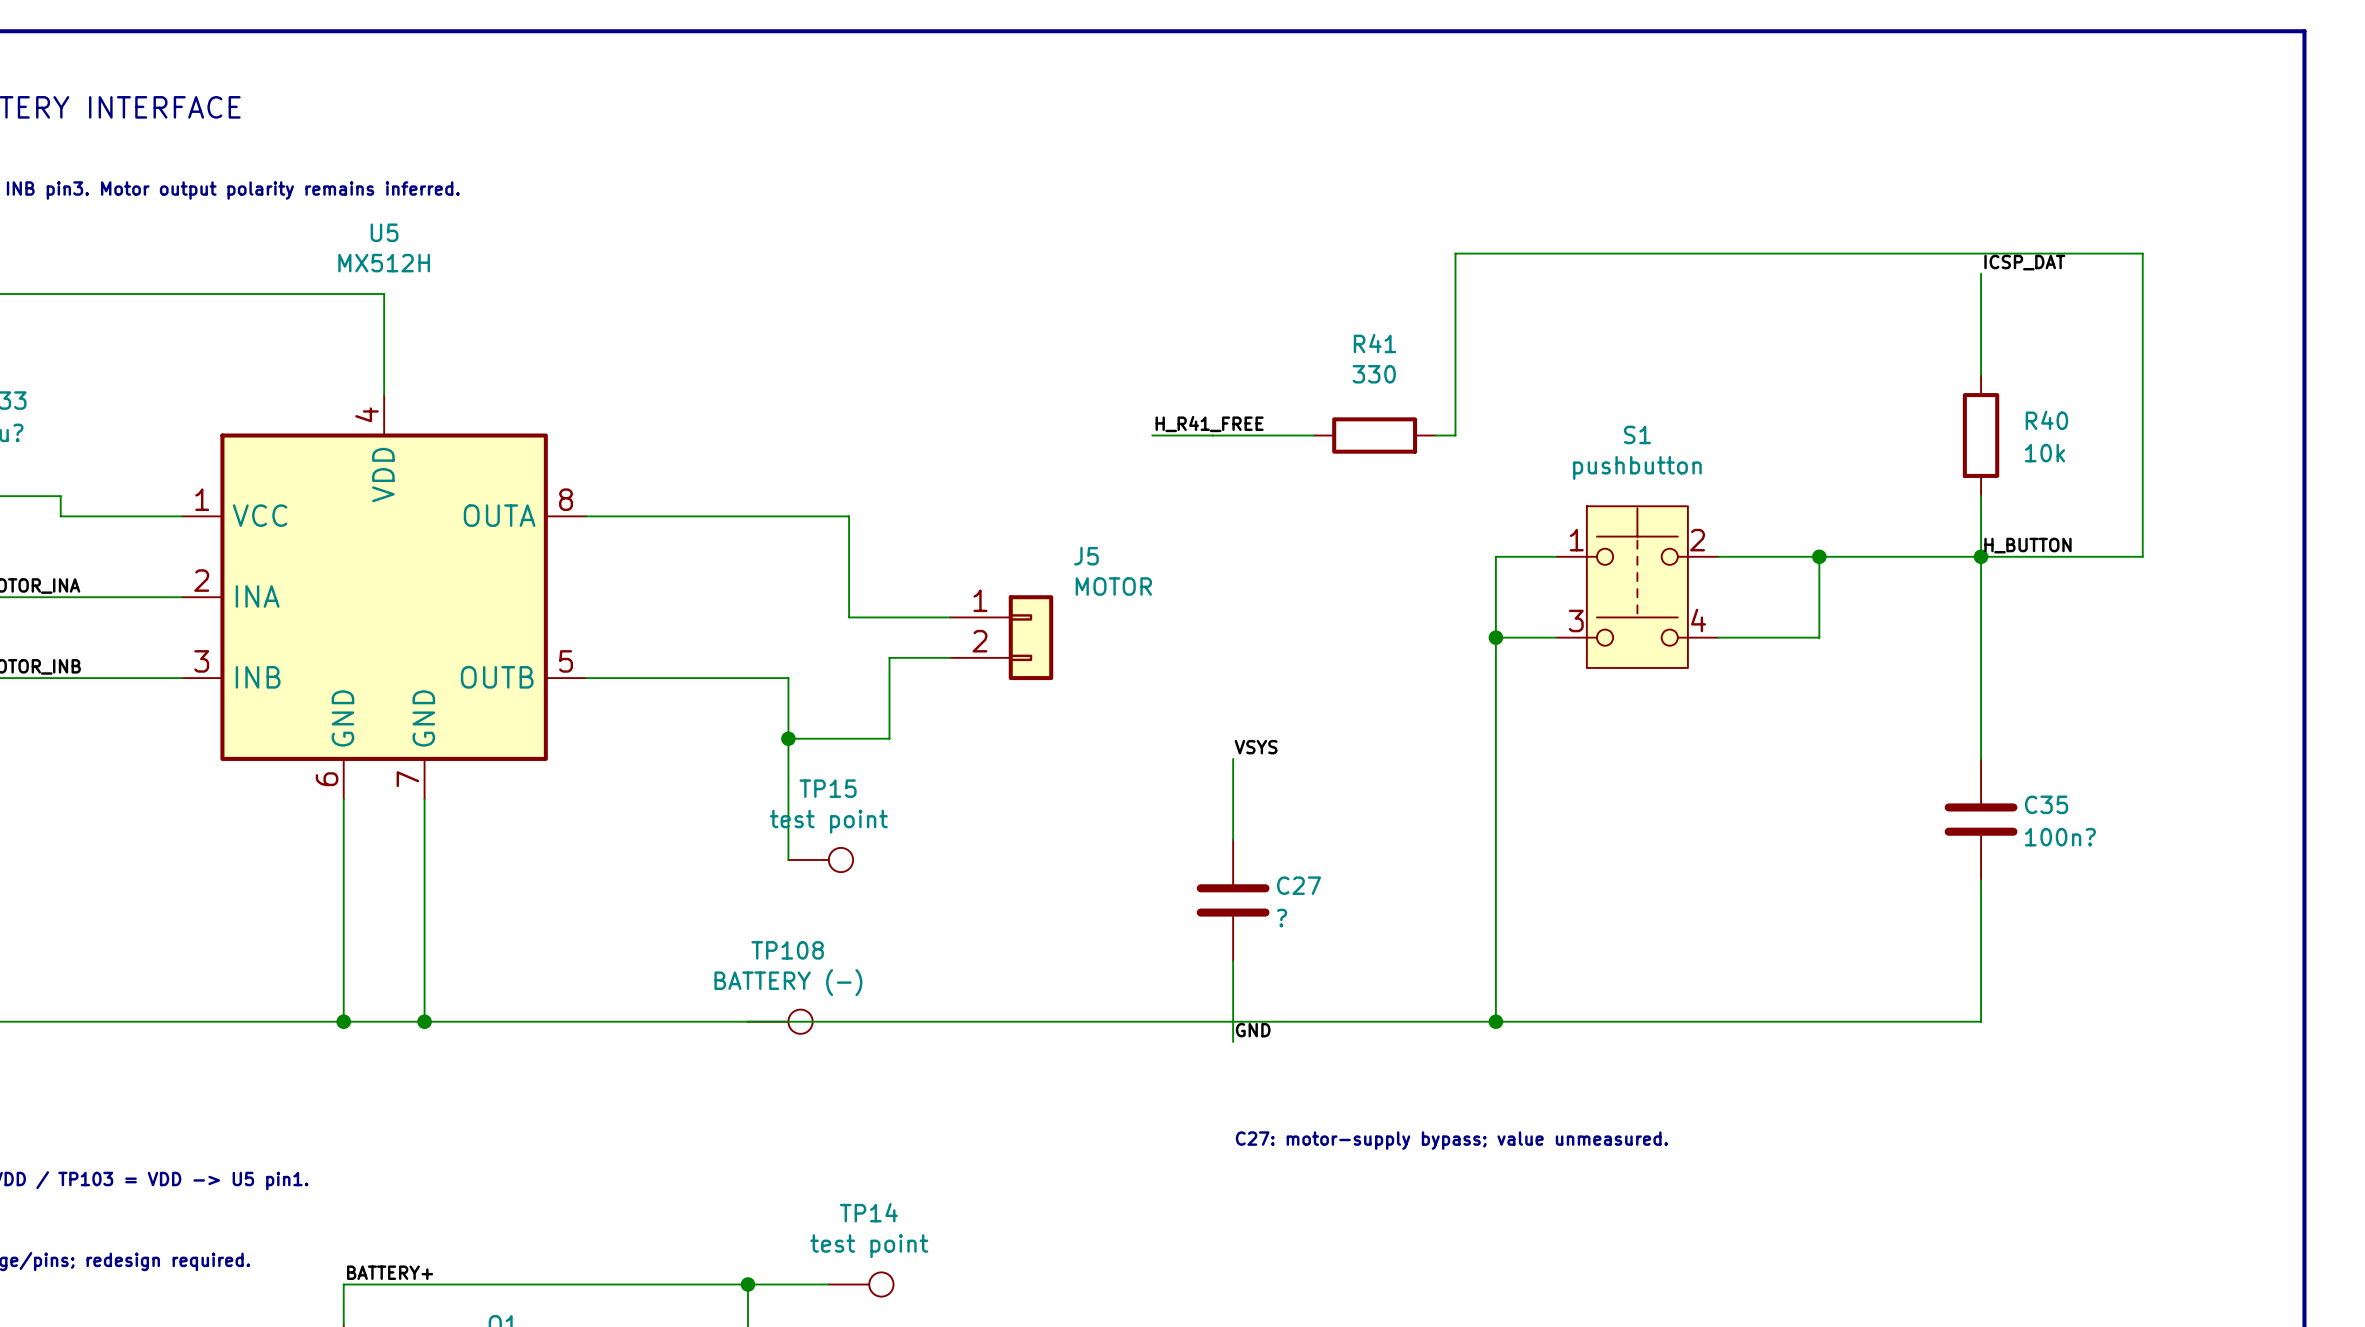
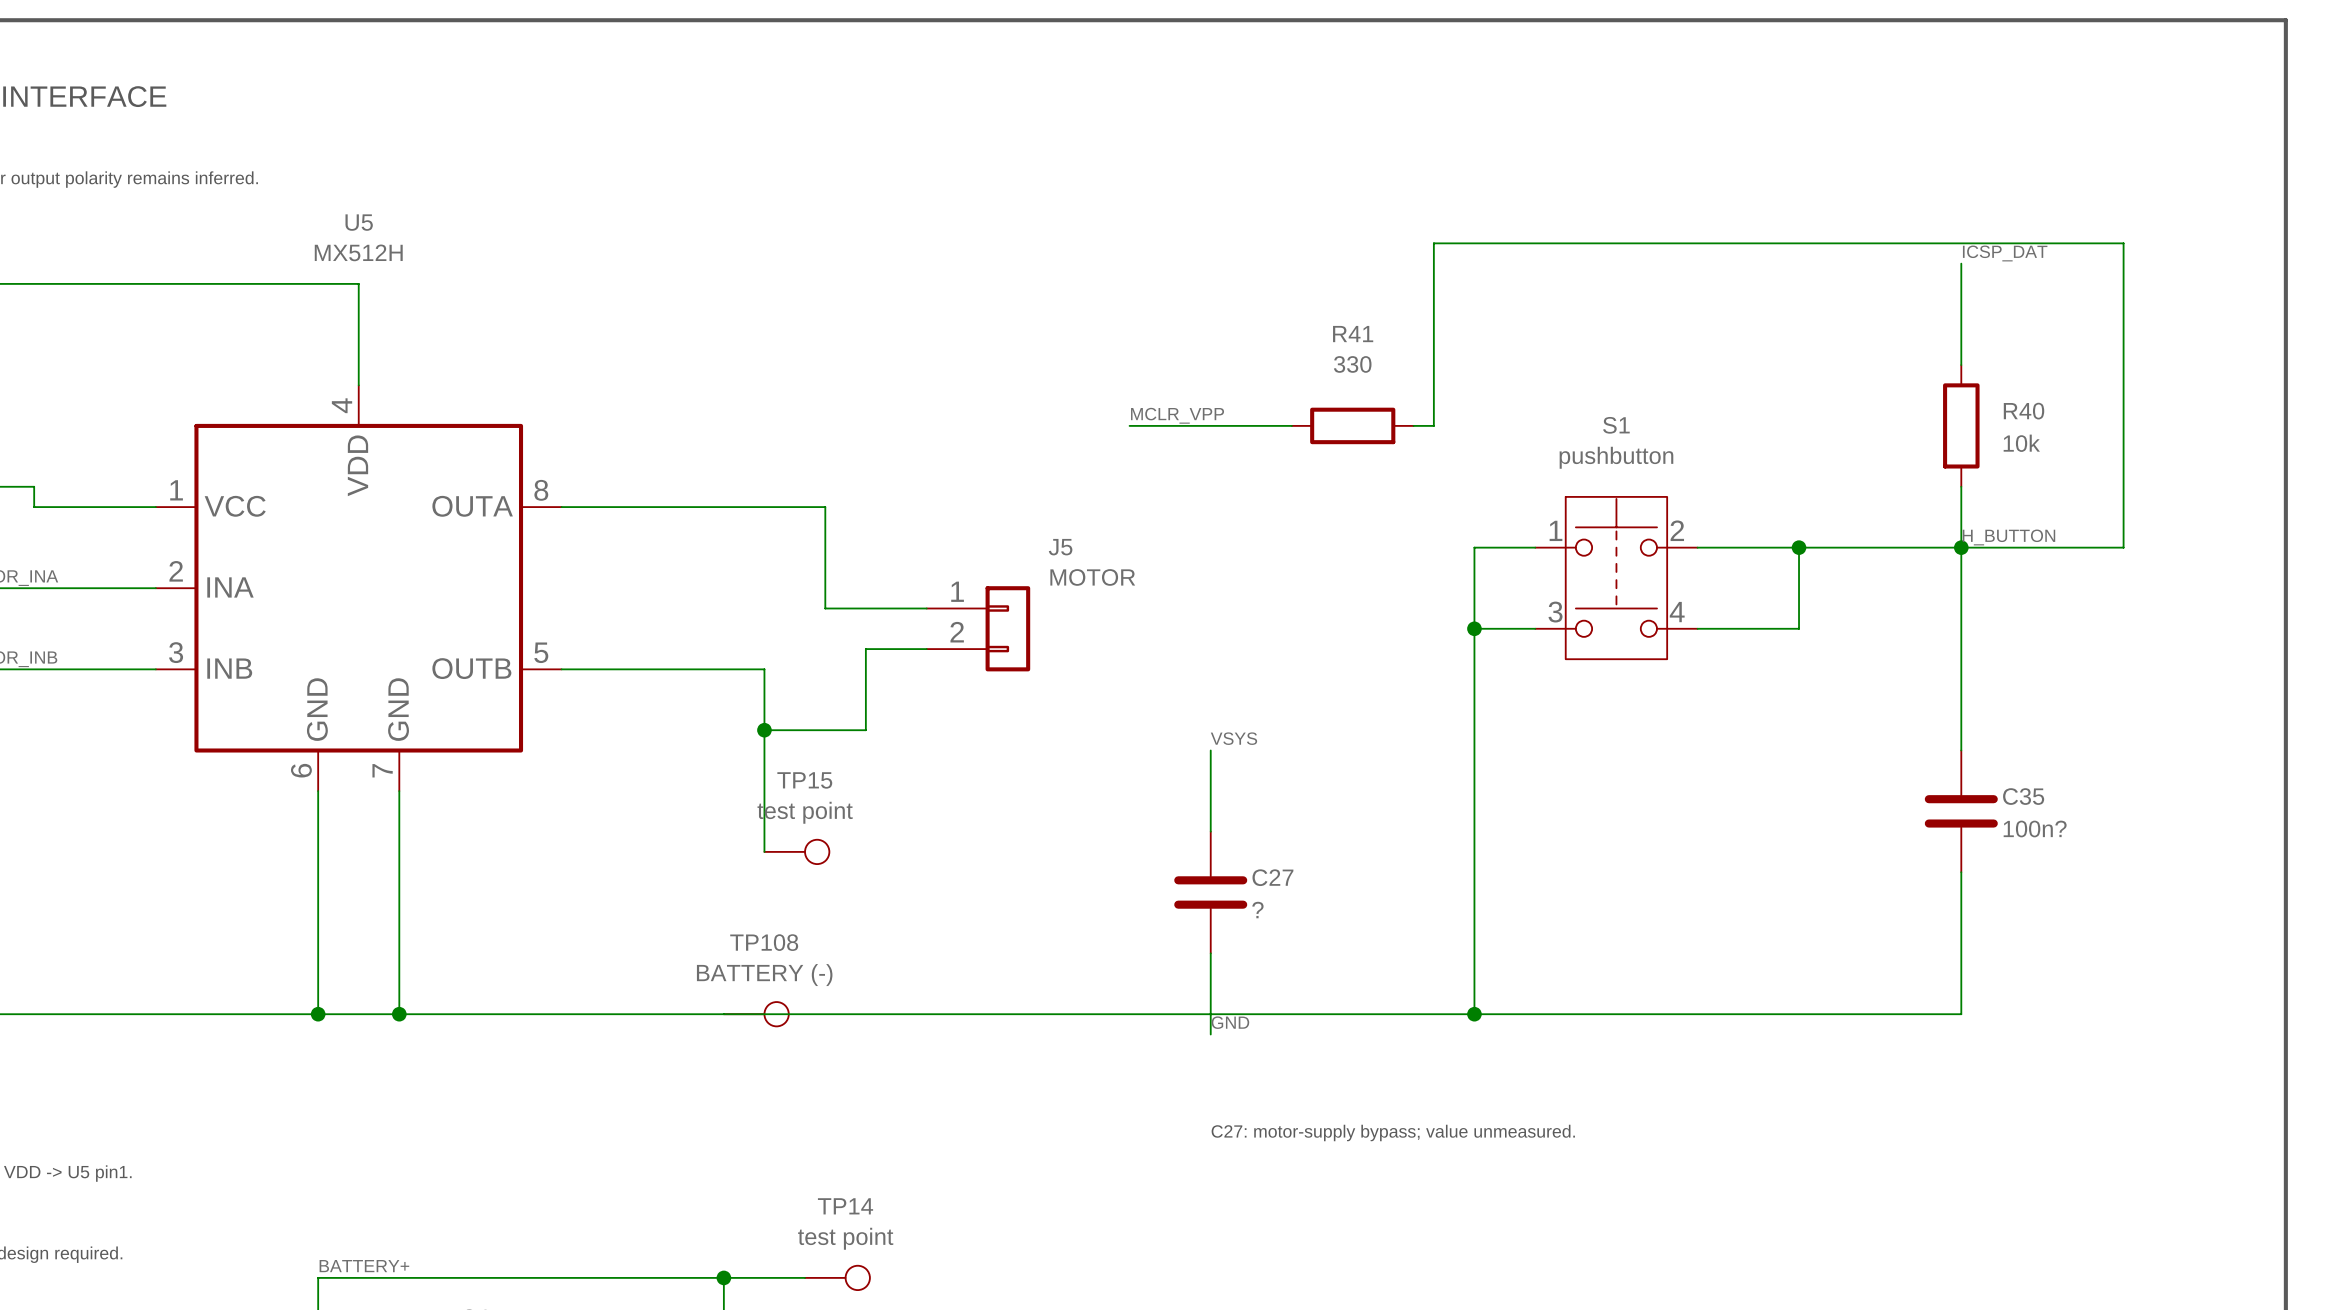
label: H_R41_FREE (1209, 424) -> MCLR_VPP (1177, 415)

